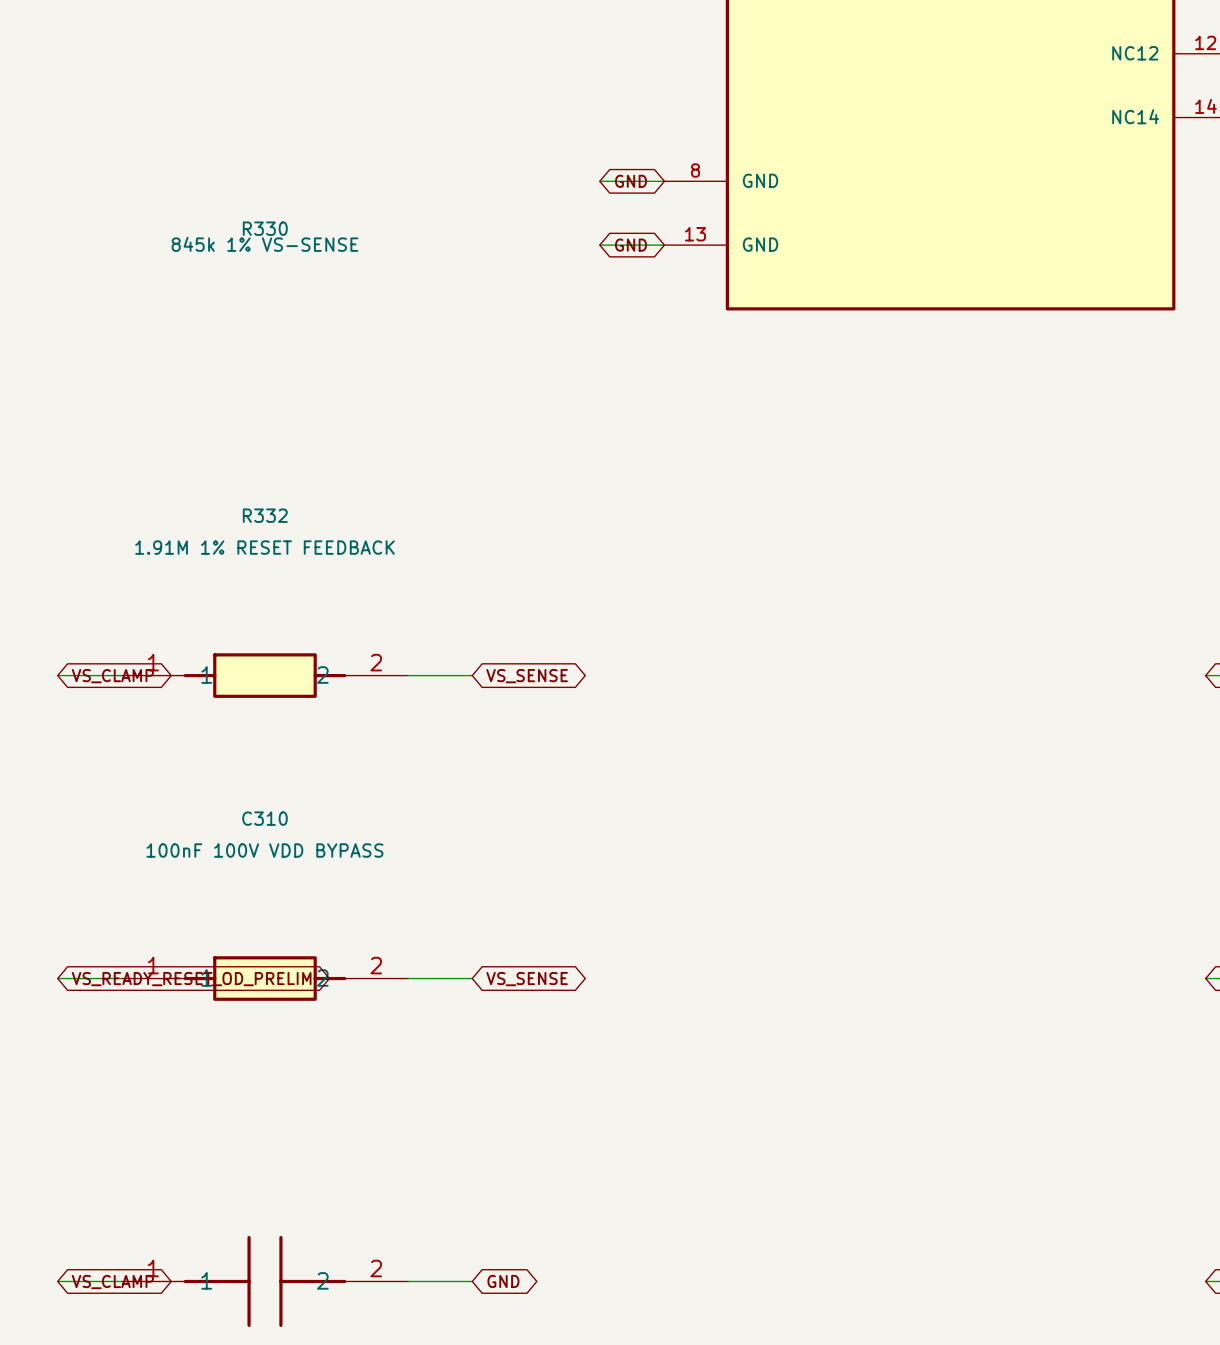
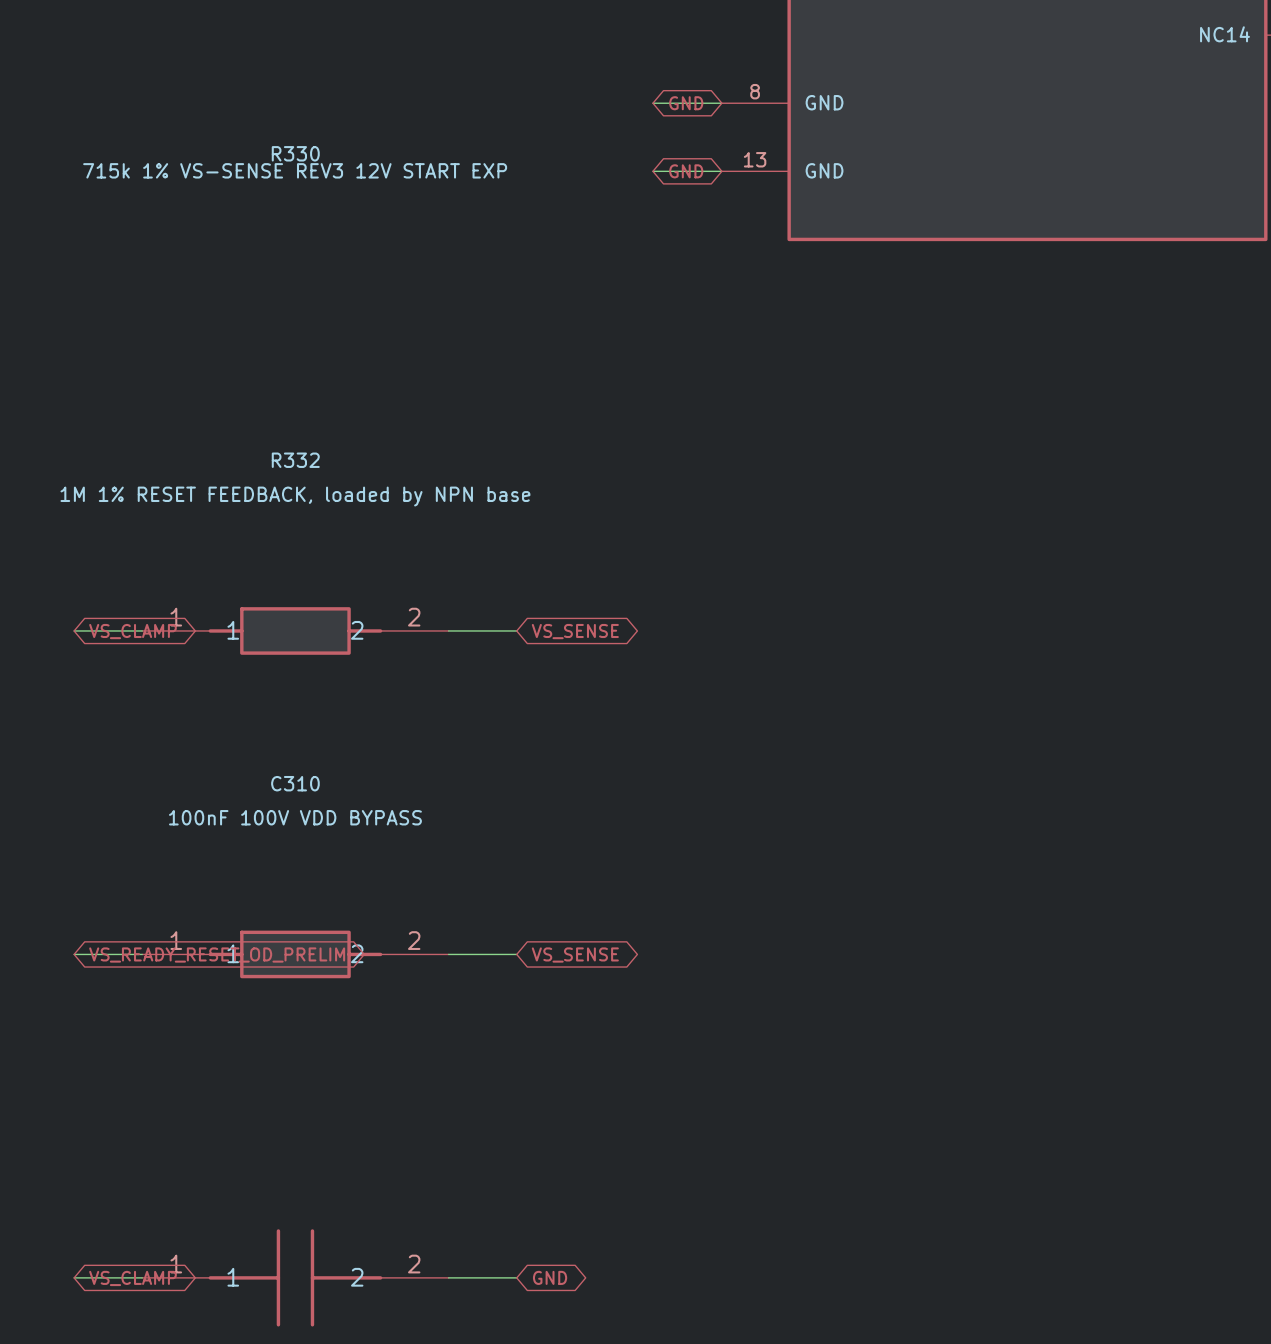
R330 value: 845k 1% VS-SENSE (264, 244) -> 715k 1% VS-SENSE REV3 12V START EXP (295, 170)
R332 value: 1.91M 1% RESET FEEDBACK (264, 547) -> 1M 1% RESET FEEDBACK, loaded by NPN base (295, 496)

